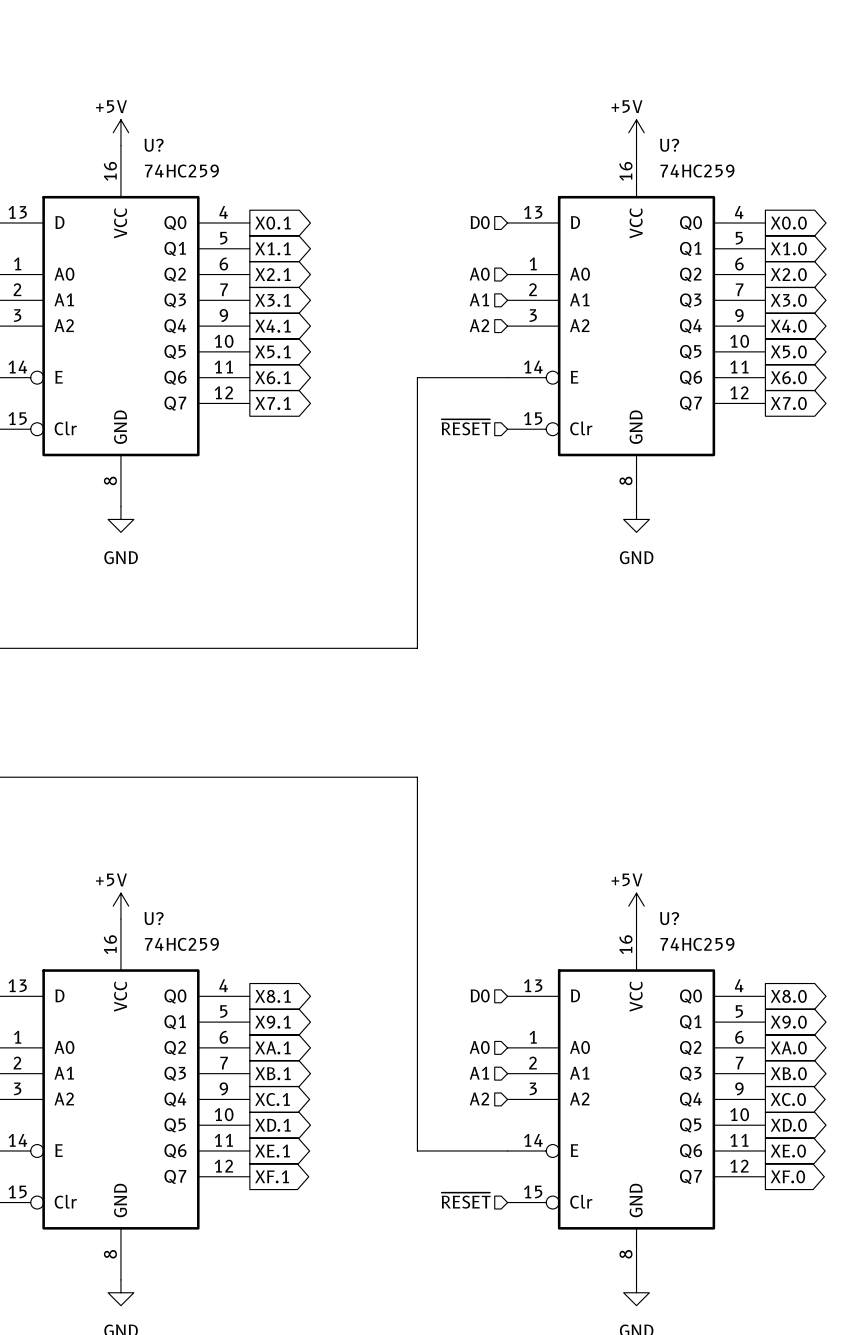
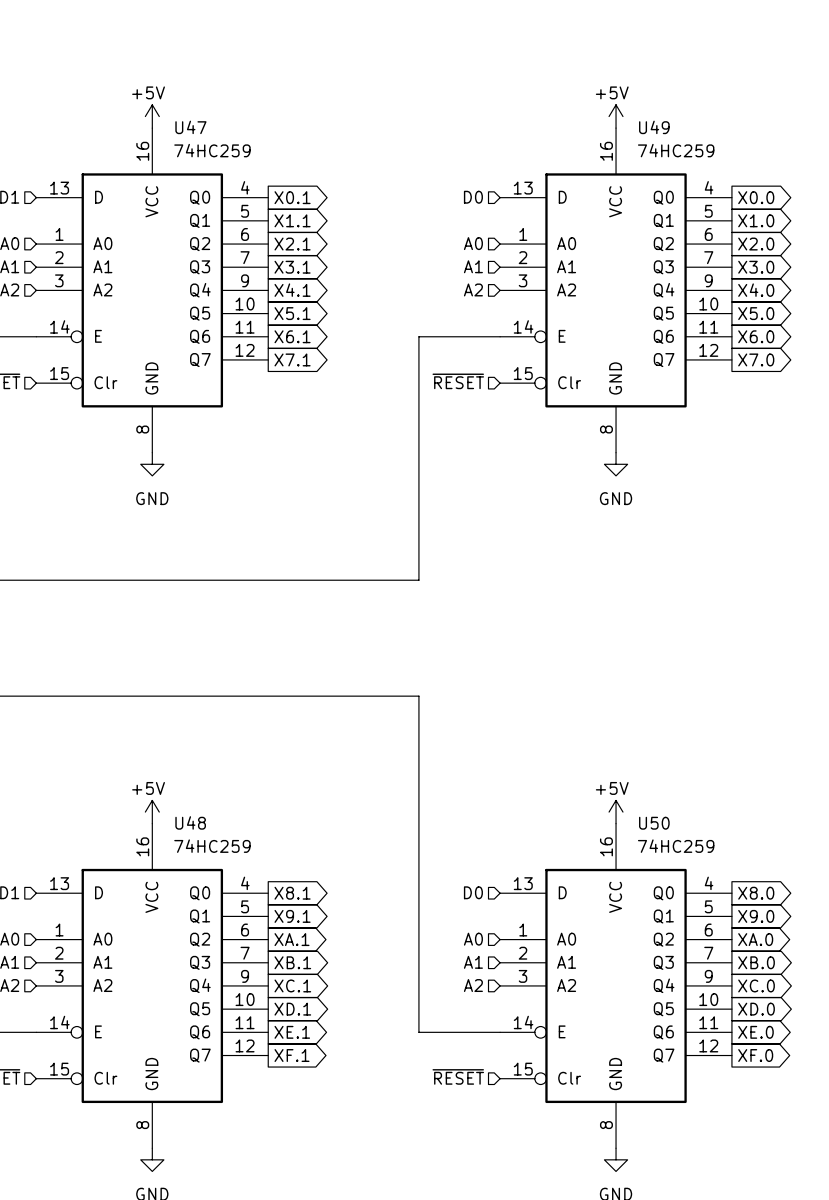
U? name: U? (154, 145) -> U47 (190, 127)
U? name: U? (669, 145) -> U49 (654, 127)
U? name: U? (154, 918) -> U48 (190, 822)
U? name: U? (669, 918) -> U50 (654, 823)

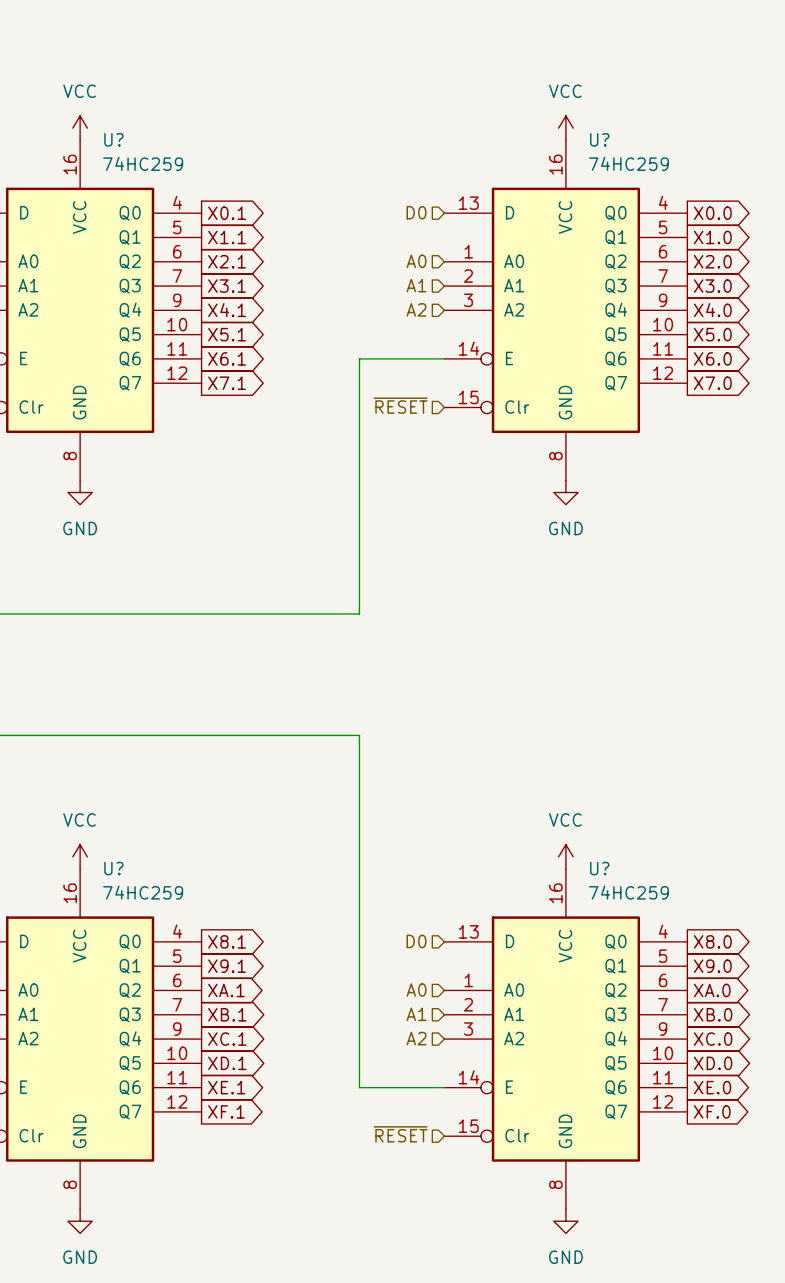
power symbol: +5V (152, 116) -> VCC (80, 128)
power symbol: +5V (616, 116) -> VCC (565, 128)
U47 name: U47 (190, 127) -> U? (113, 139)
U49 name: U49 (654, 127) -> U? (599, 139)
power symbol: +5V (152, 812) -> VCC (80, 856)
power symbol: +5V (616, 812) -> VCC (565, 856)
U48 name: U48 (190, 822) -> U? (113, 868)
U50 name: U50 (654, 823) -> U? (599, 868)

